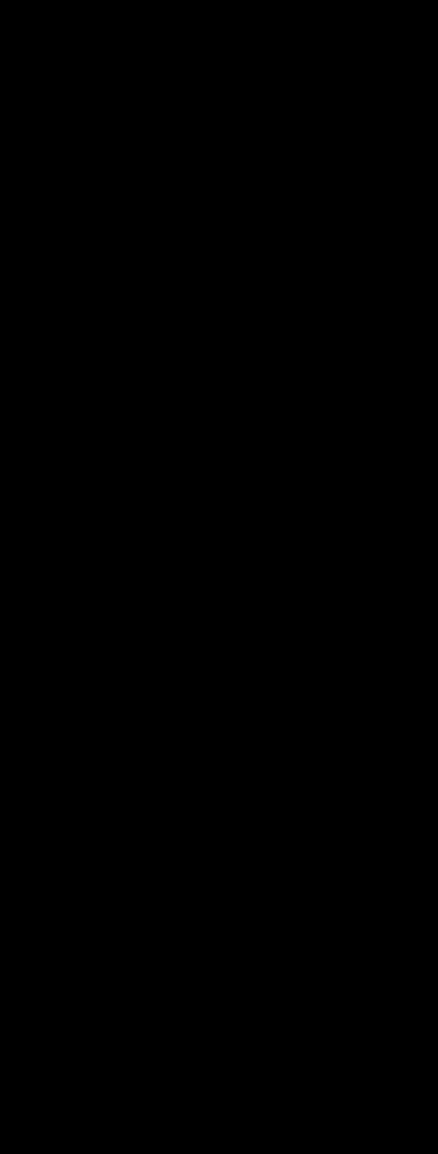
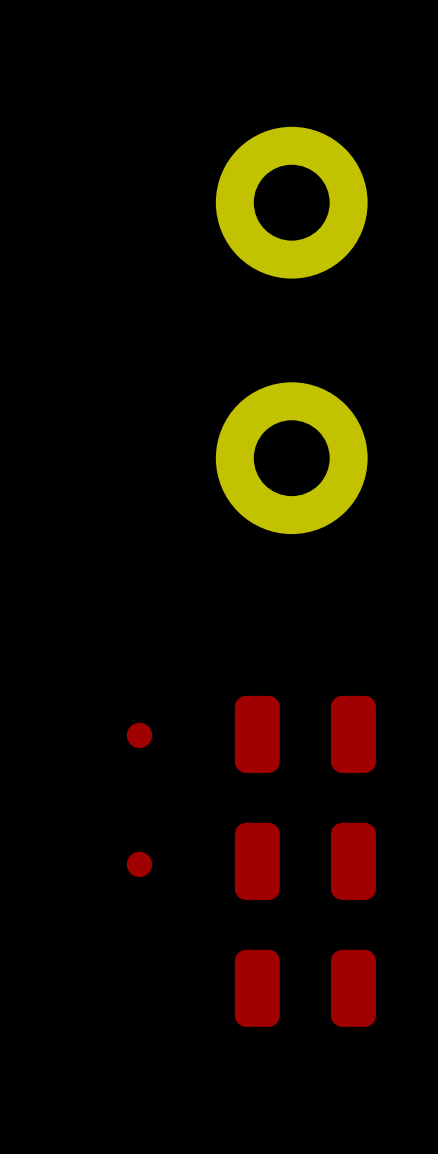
part: none -> (291, 202)
part: none -> (291, 458)
part: none -> (305, 734)
part: none -> (139, 735)
part: none -> (305, 861)
part: none -> (139, 864)
part: none -> (305, 988)

